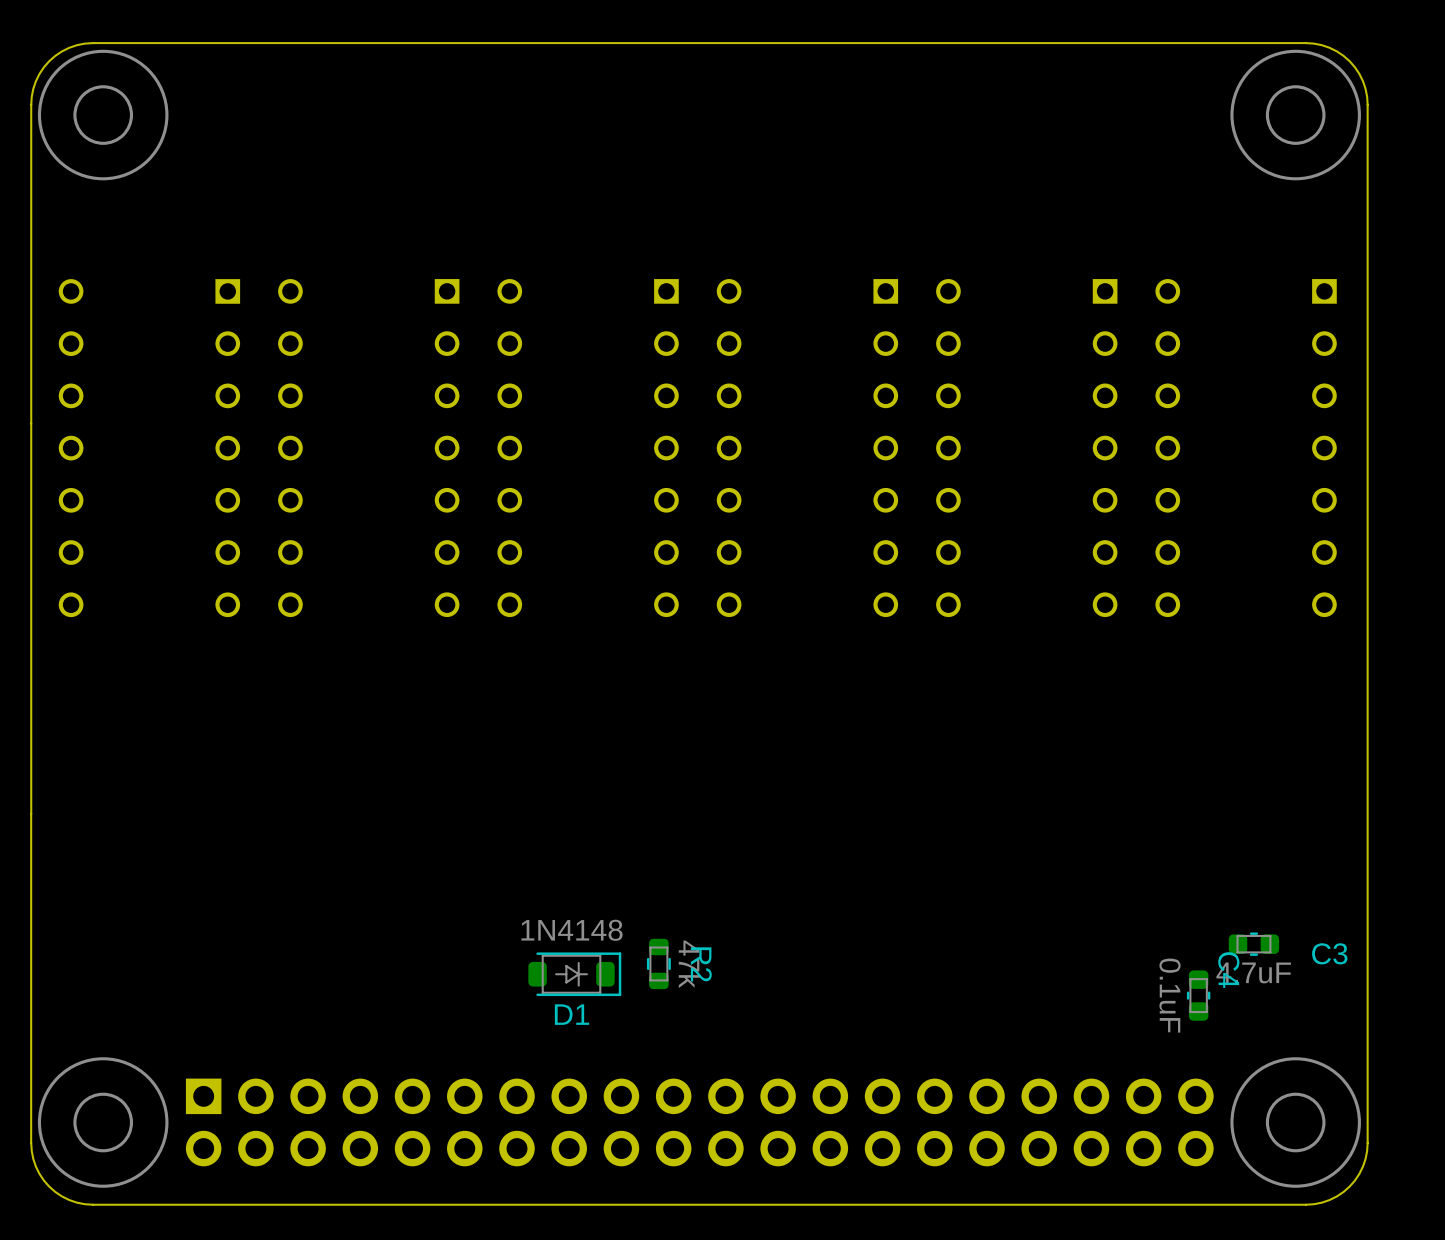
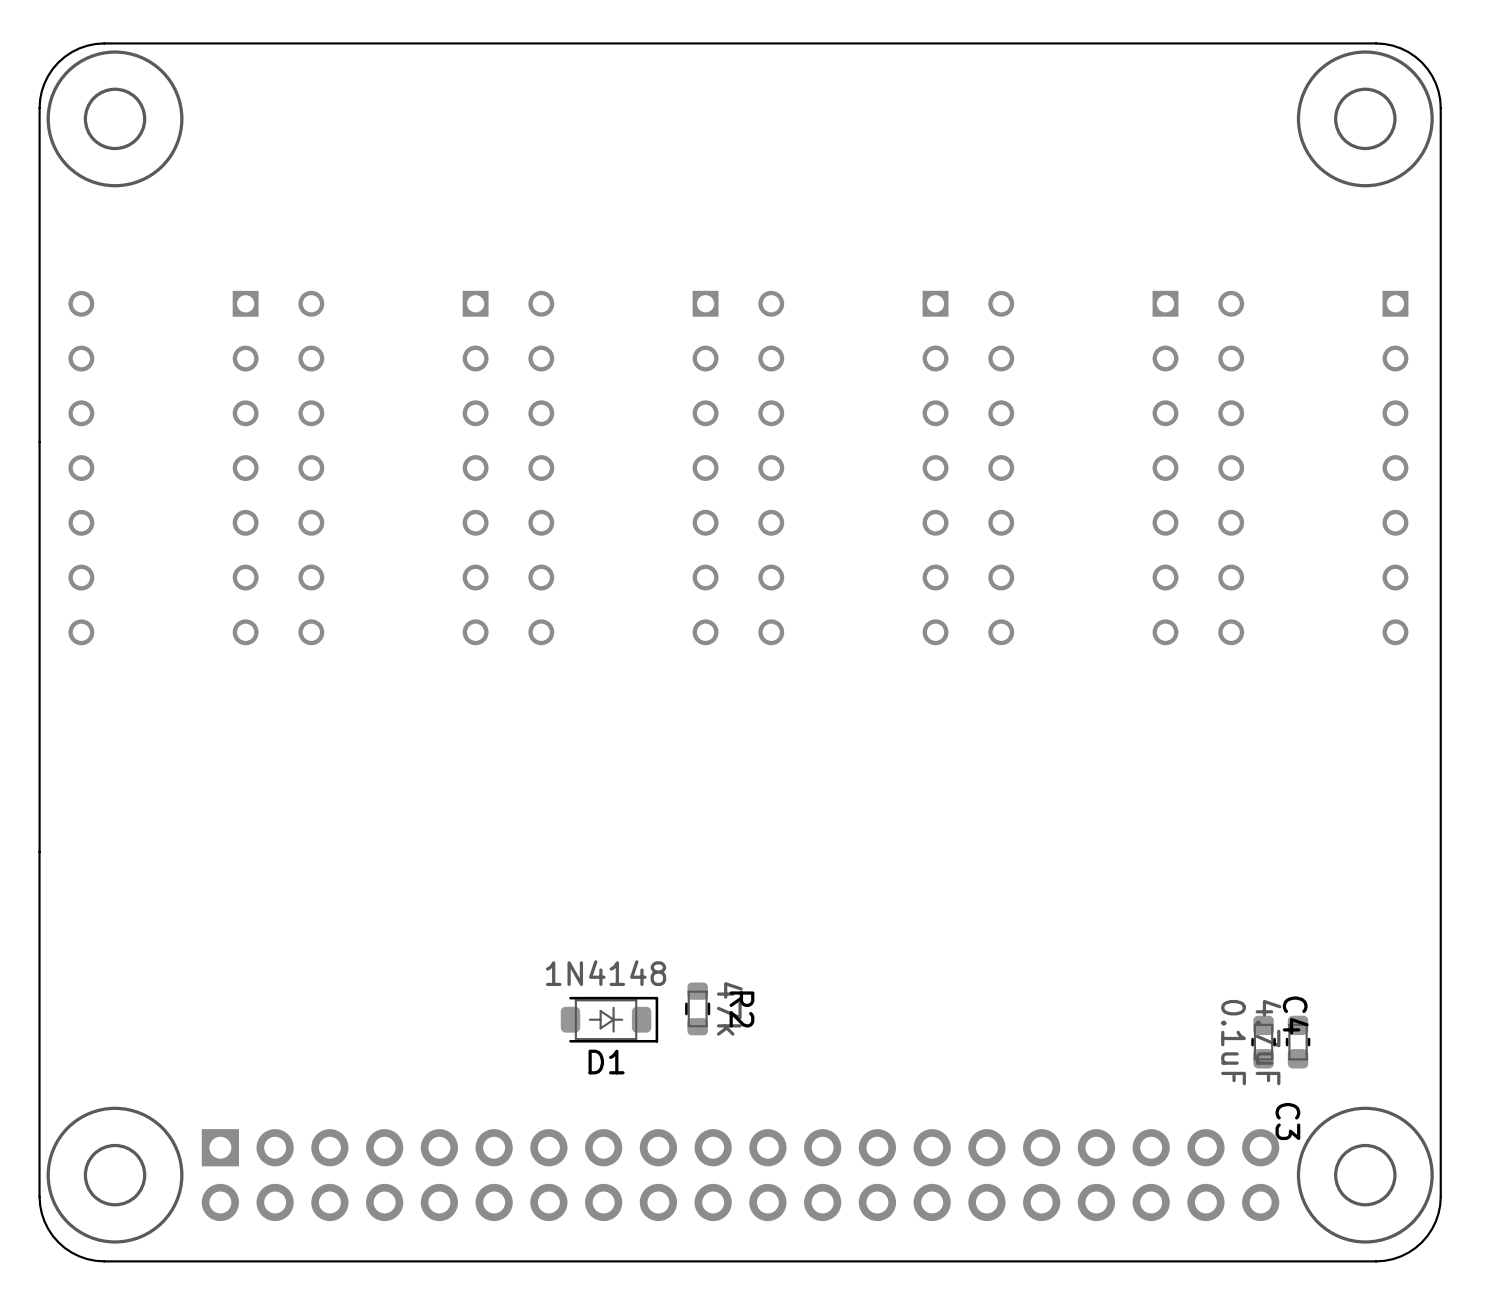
C3 rotation: 0° (1253, 944) -> 90° clockwise (1298, 1042)
C3 position: (1253, 944) -> (1298, 1042)

